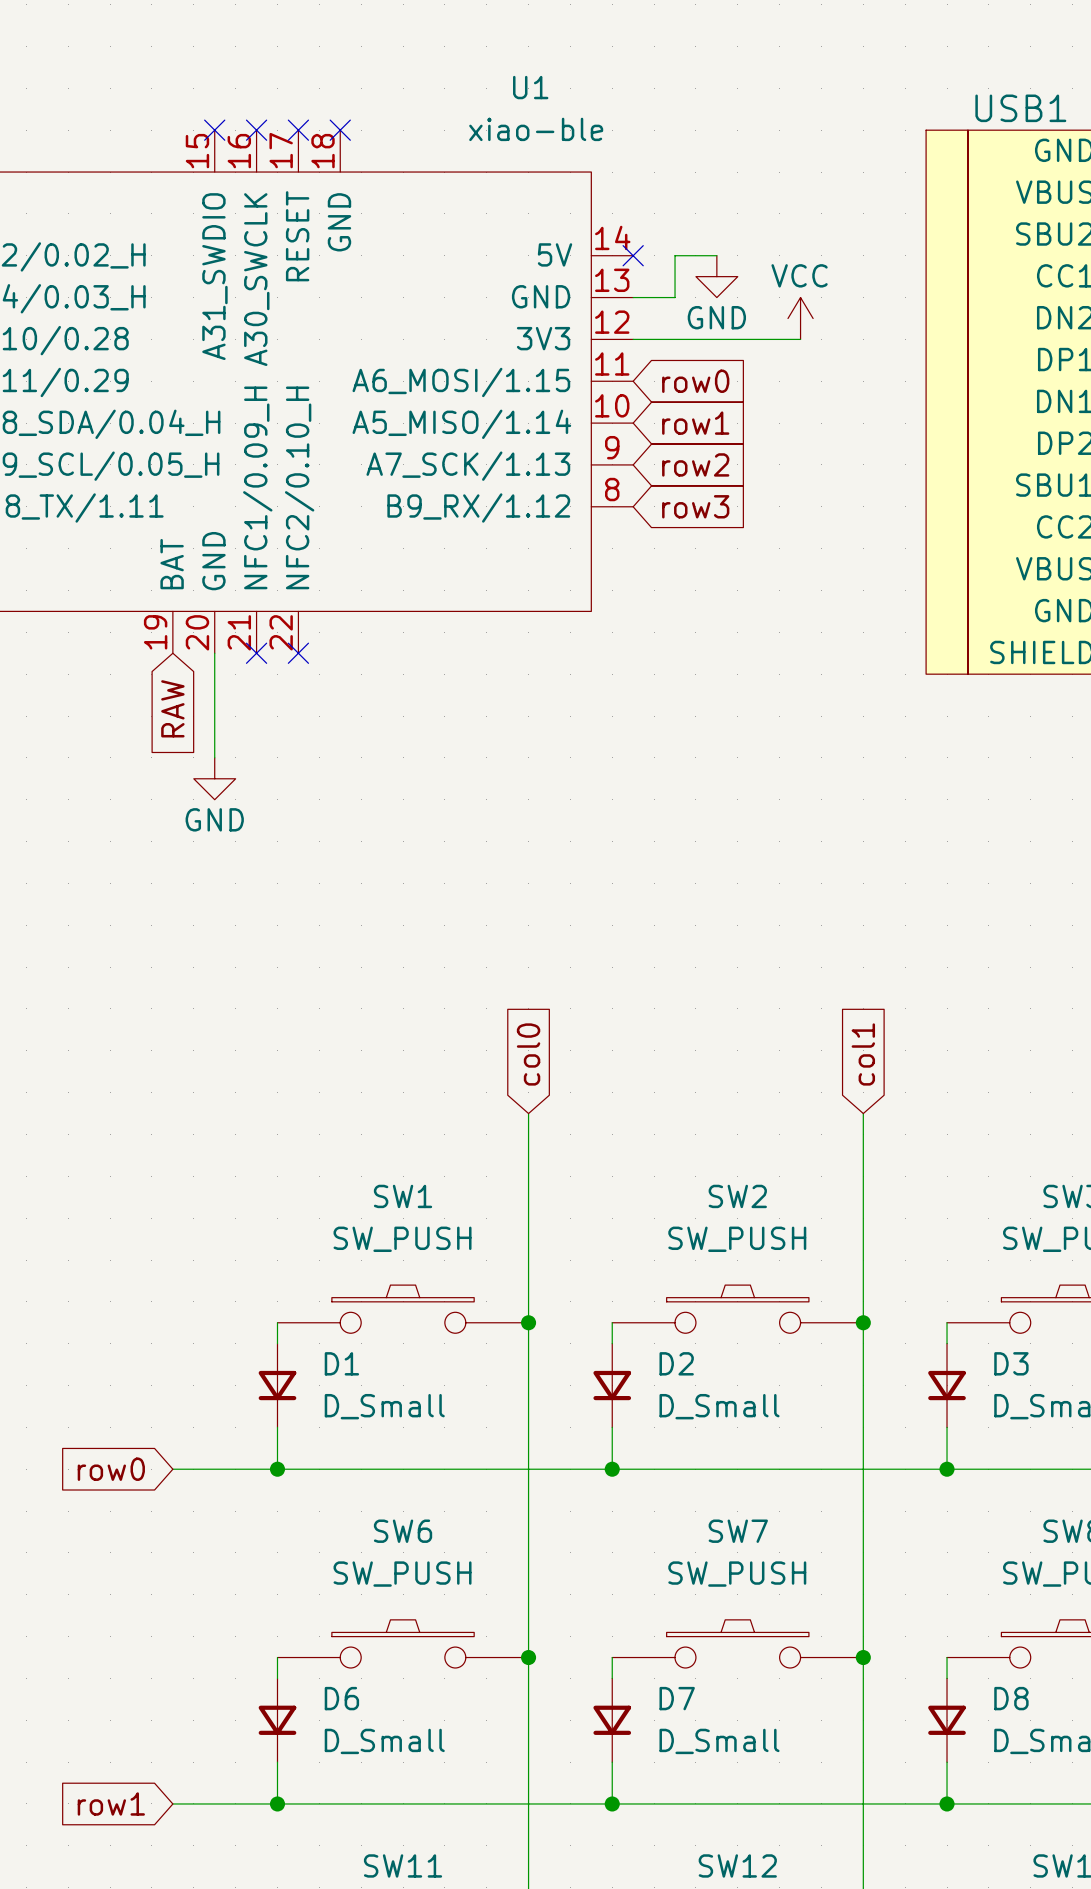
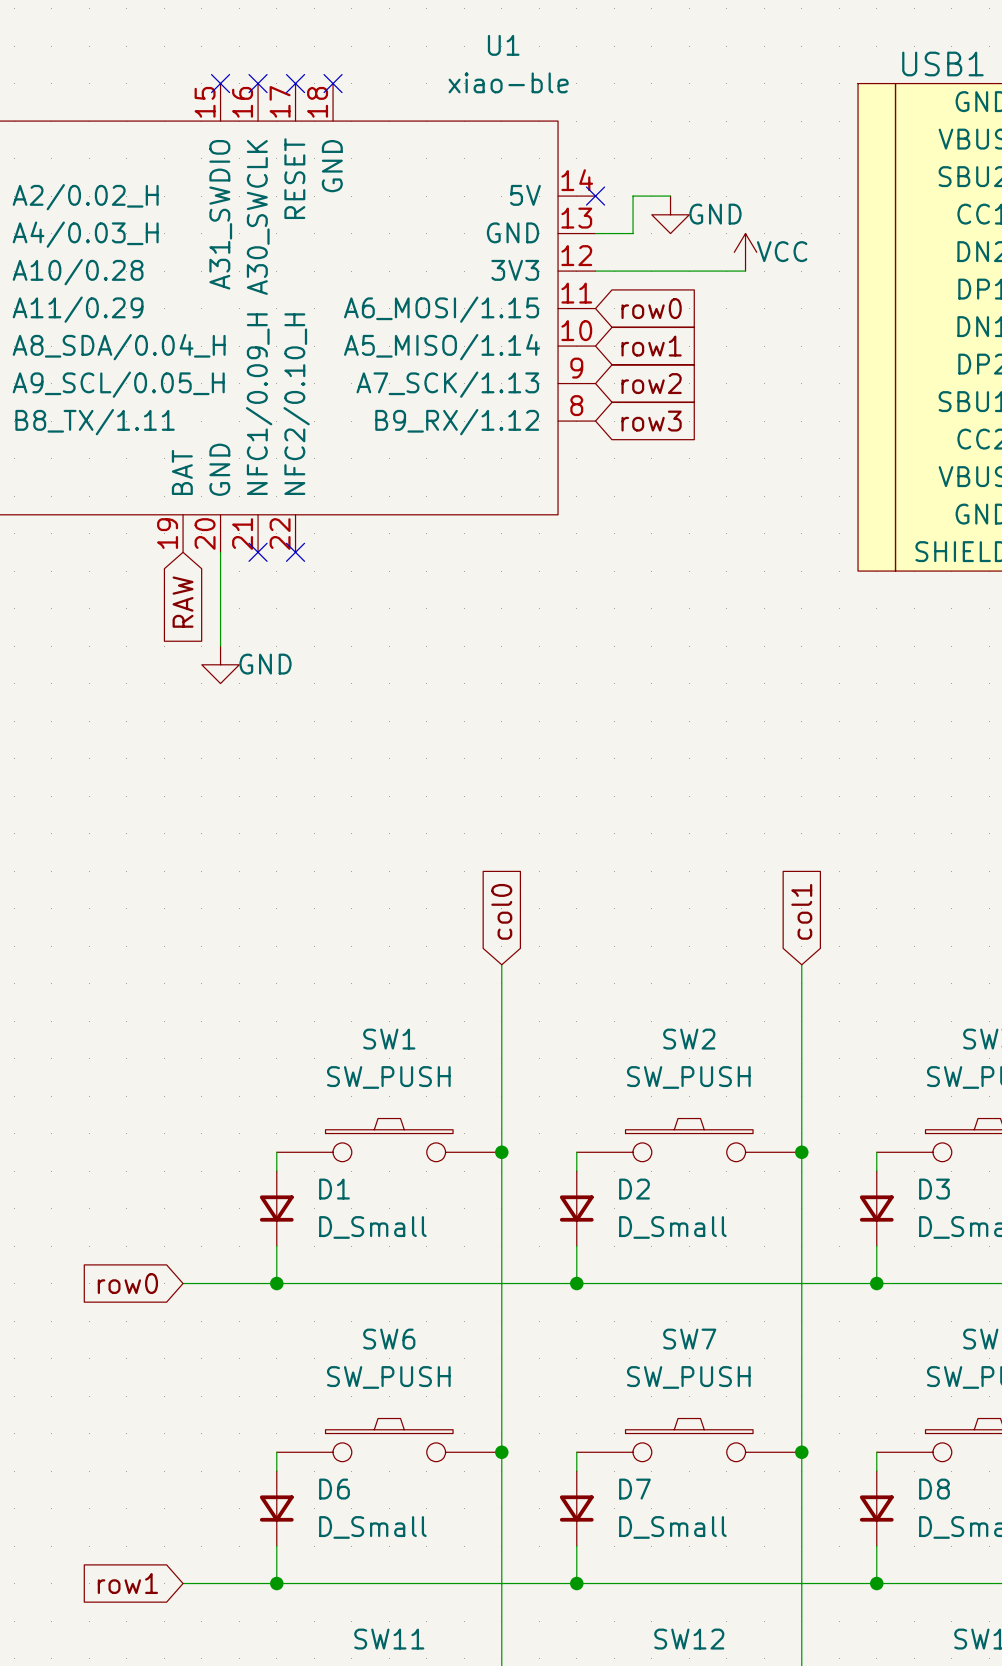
power symbol text position: VCC (799, 275) -> VCC (782, 251)
power symbol text position: GND (716, 317) -> GND (715, 214)
power symbol text position: GND (214, 819) -> GND (265, 664)

